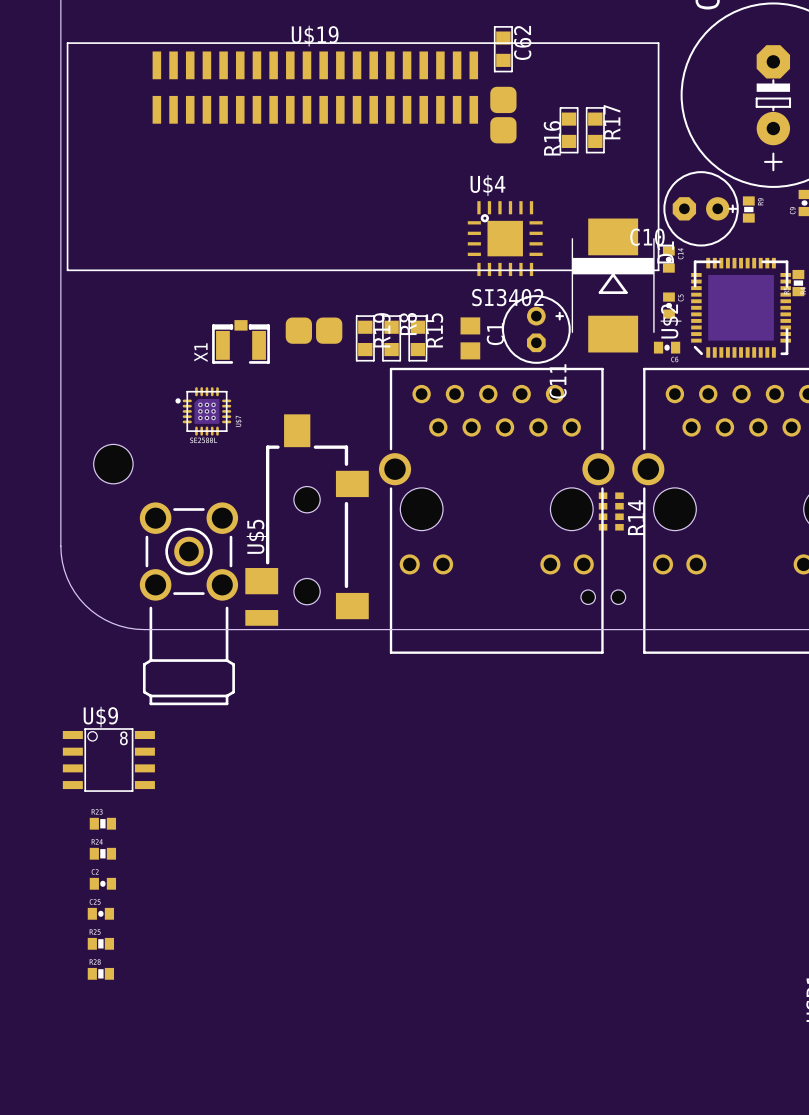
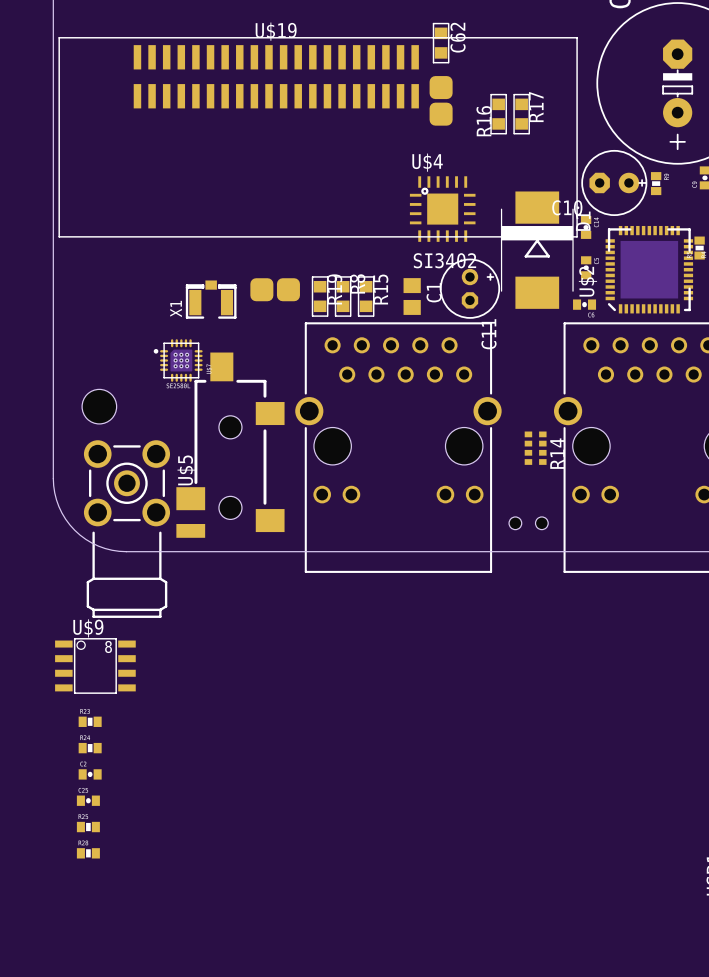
part position: (496, 510) -> (398, 447)
part position: (307, 520) -> (230, 445)
U$5 position: (188, 603) -> (126, 529)

